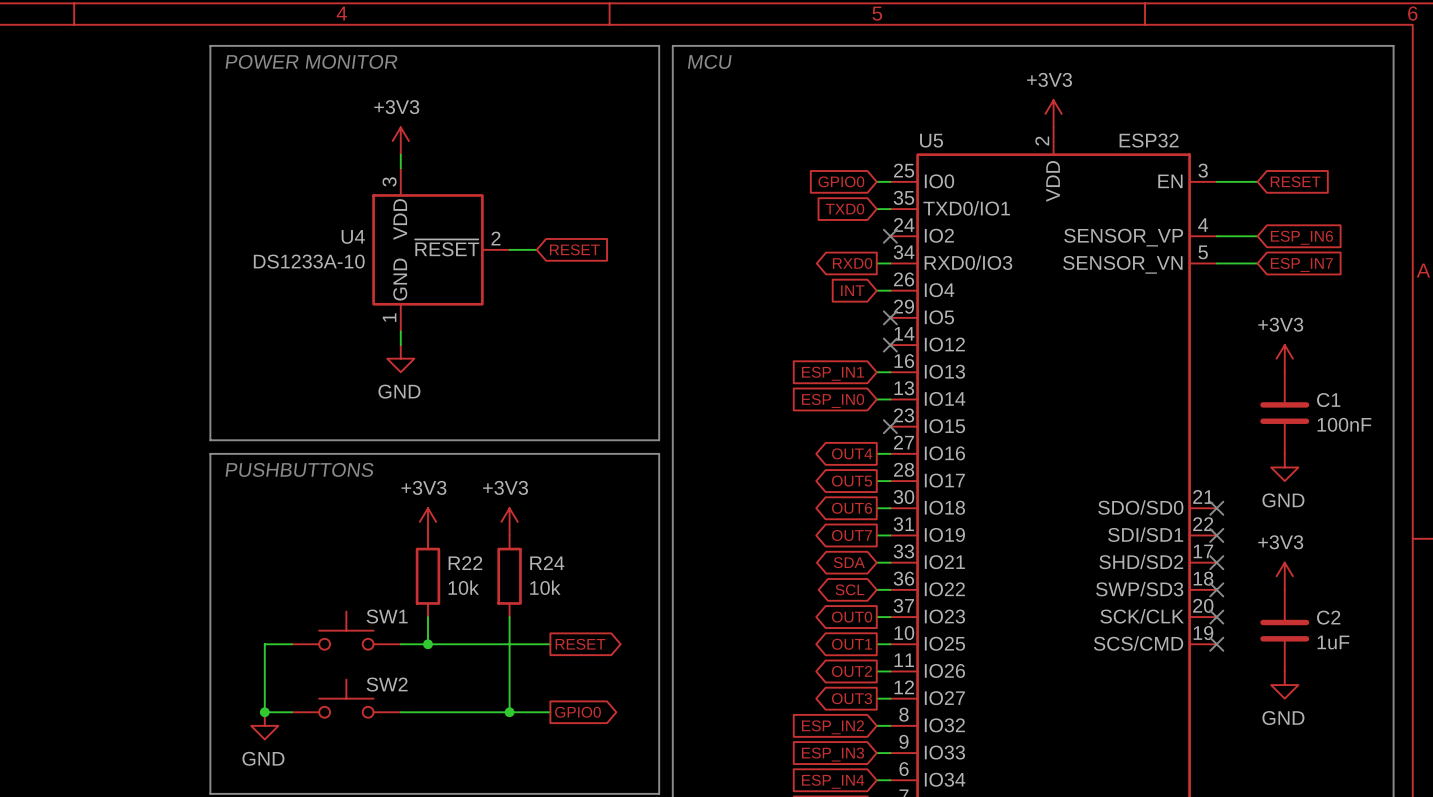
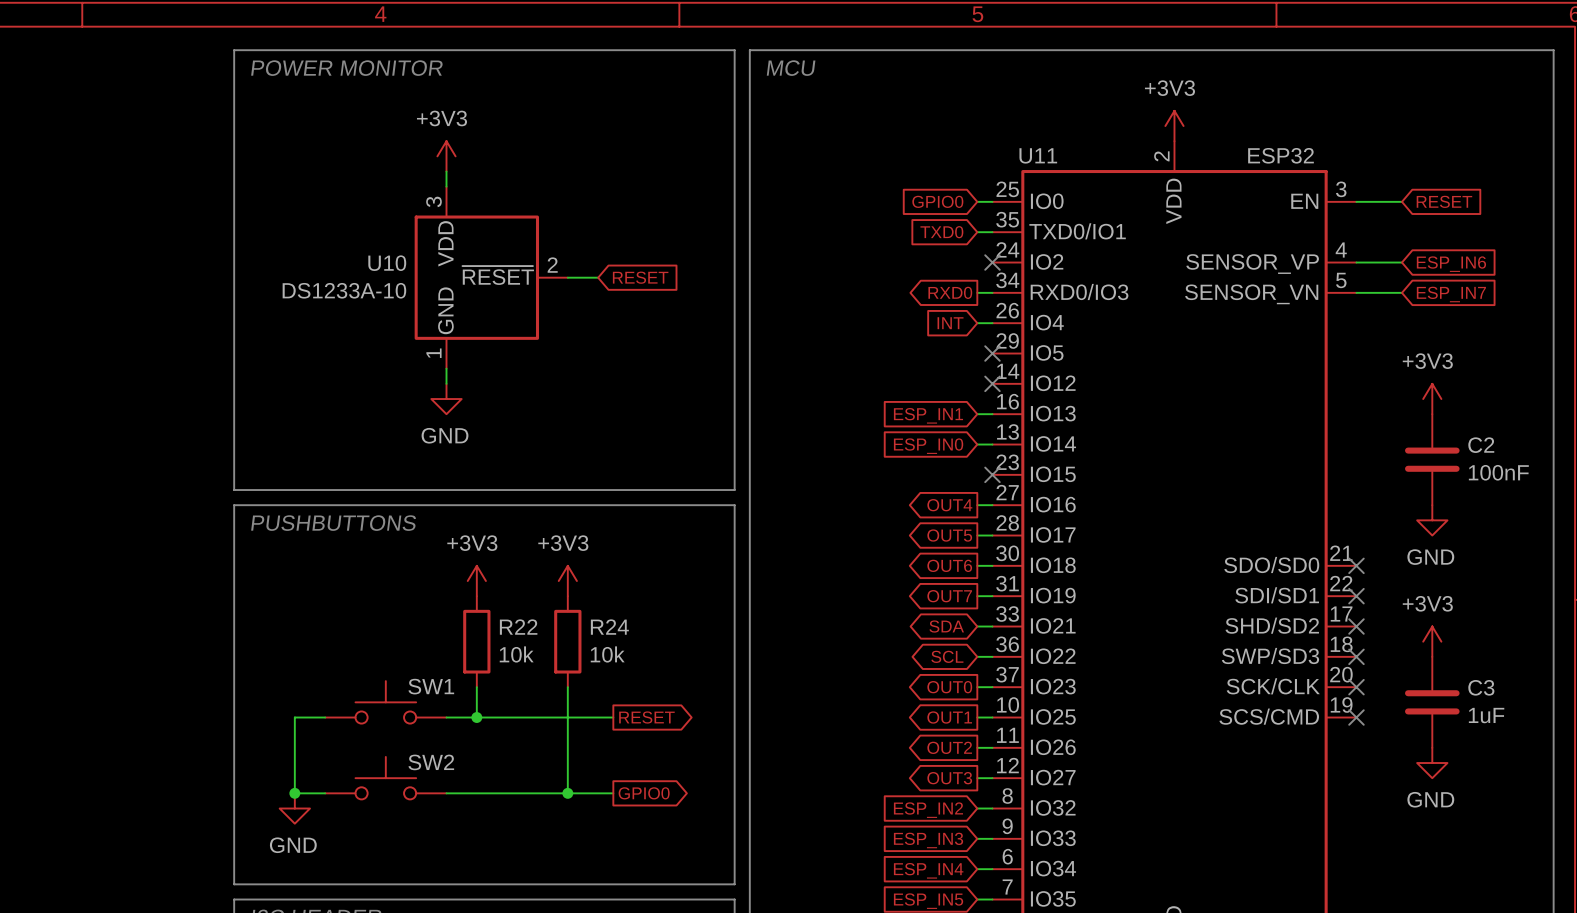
U5 name: U5 (931, 140) -> U11 (1038, 155)
U4 name: U4 (353, 236) -> U10 (387, 263)
C1 name: C1 (1328, 400) -> C2 (1481, 445)
C2 name: C2 (1328, 617) -> C3 (1481, 687)

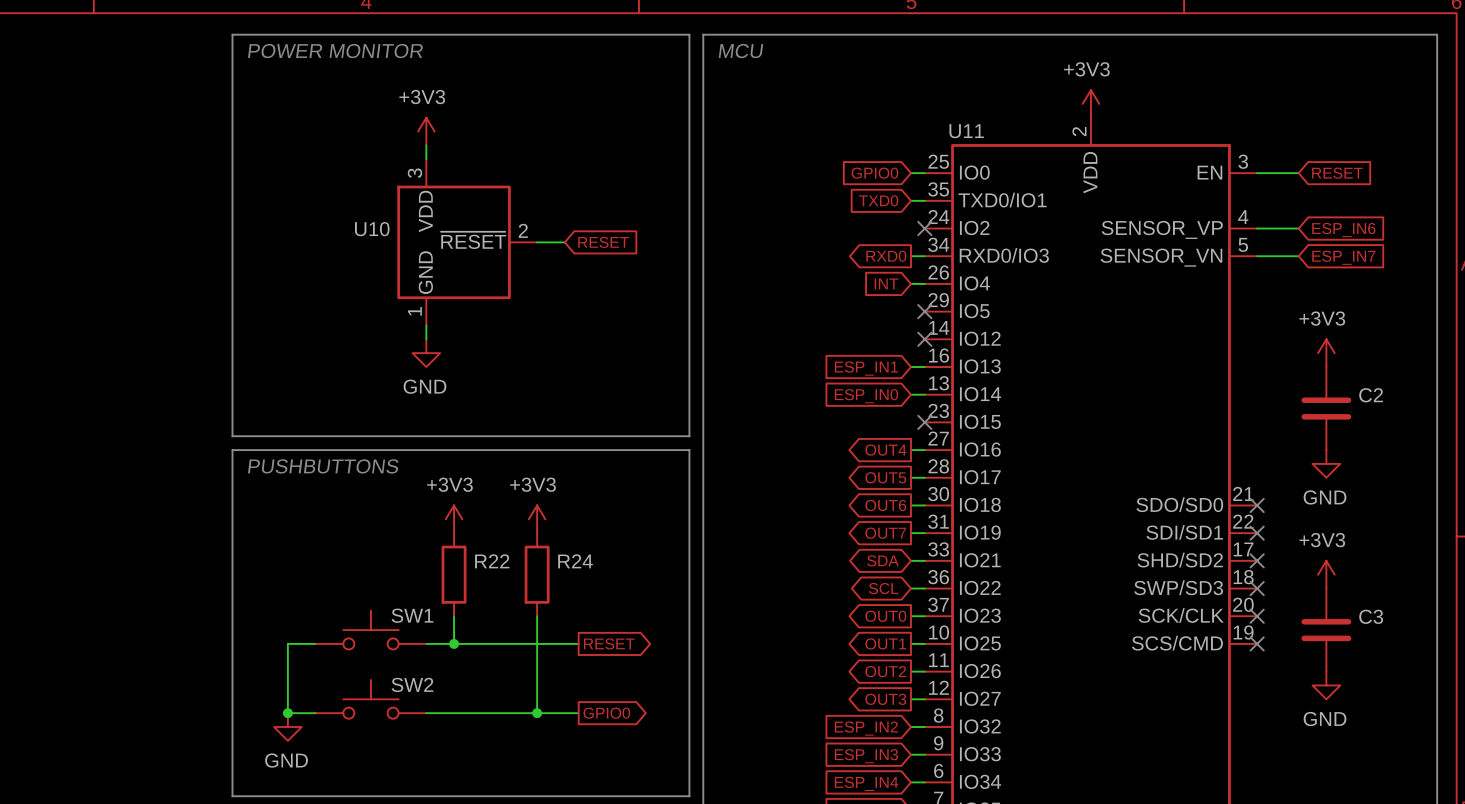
U11 value: ESP32 (1280, 155) -> none
U10 value: DS1233A-10 (344, 290) -> none
C2 value: 100nF (1498, 472) -> none
R22 value: 10k (516, 654) -> none
R24 value: 10k (607, 654) -> none
C3 value: 1uF (1486, 715) -> none

